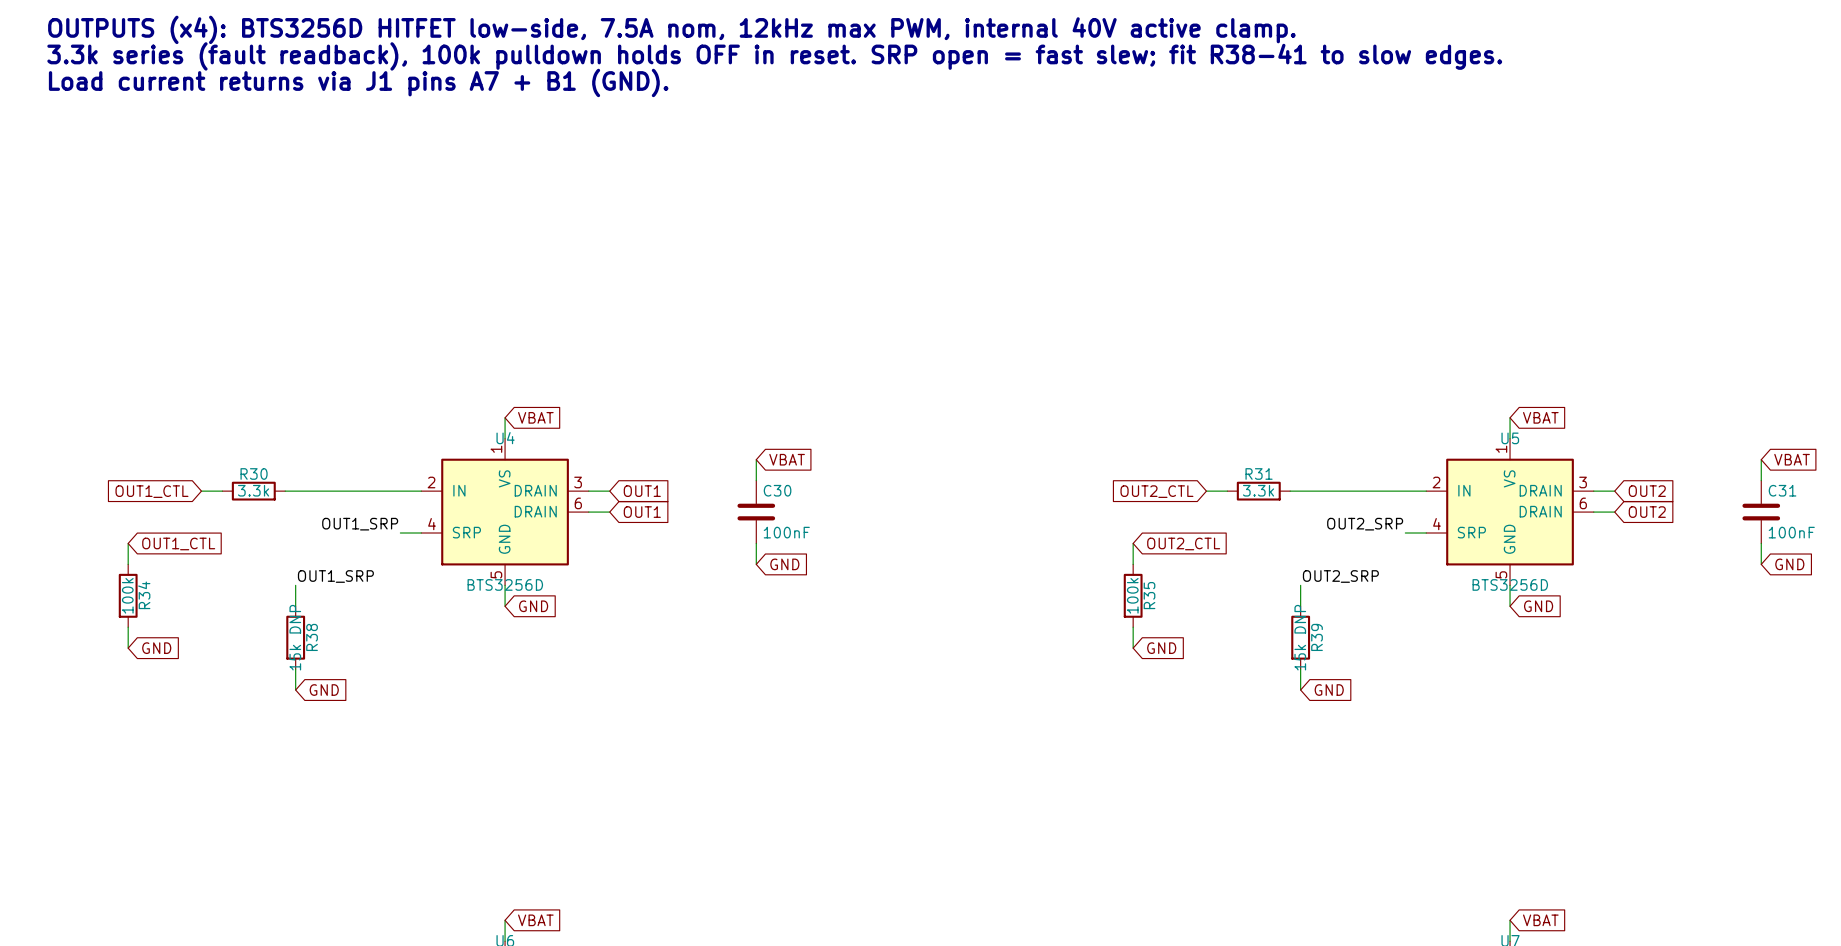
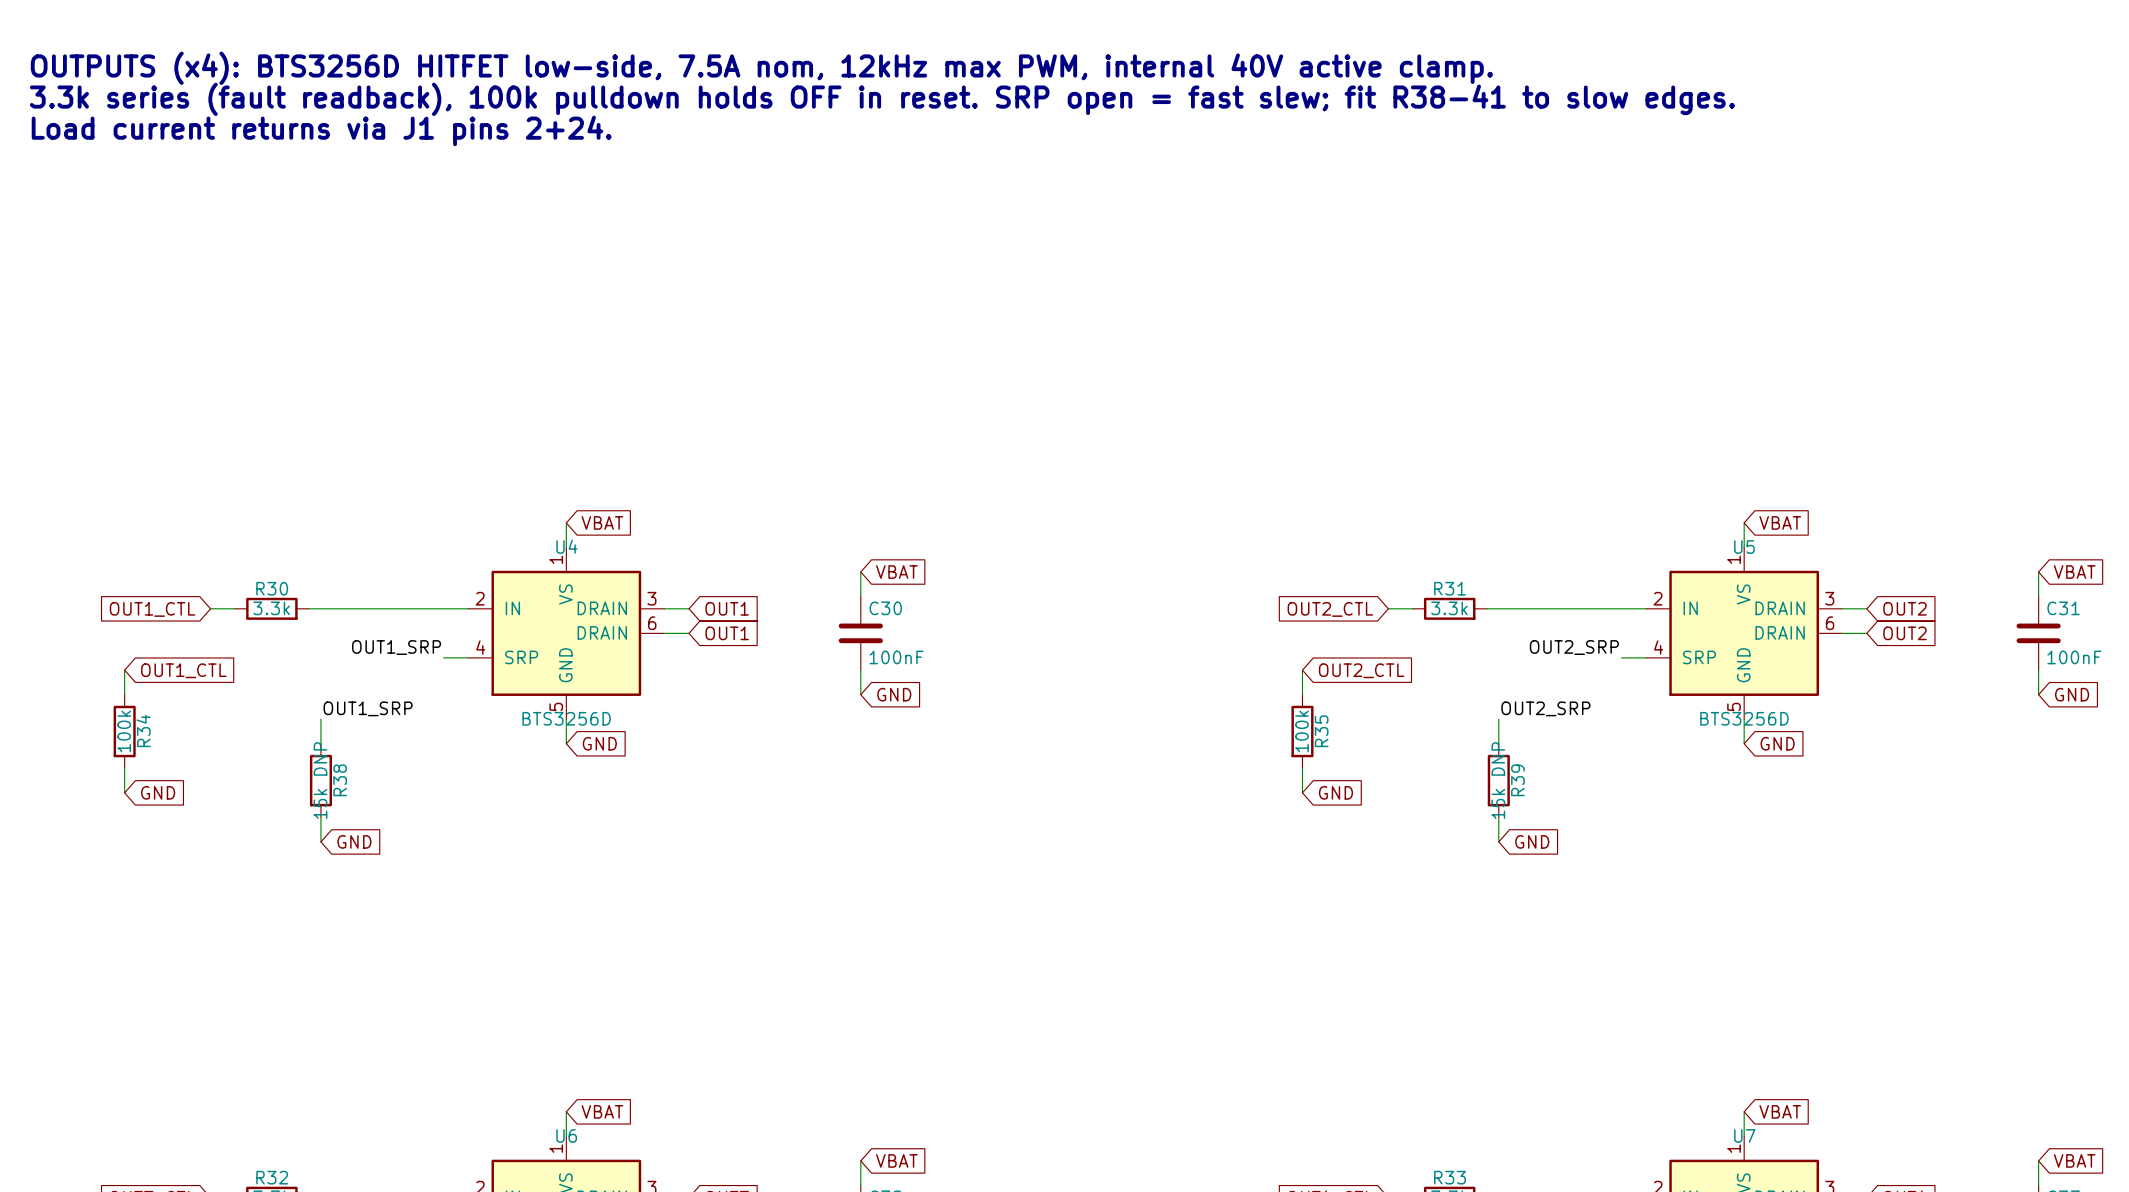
text: Load current returns via J1 pins A7 + B1 (GND). (358, 82) -> Load current returns via J1 pins 2+24. (321, 130)

